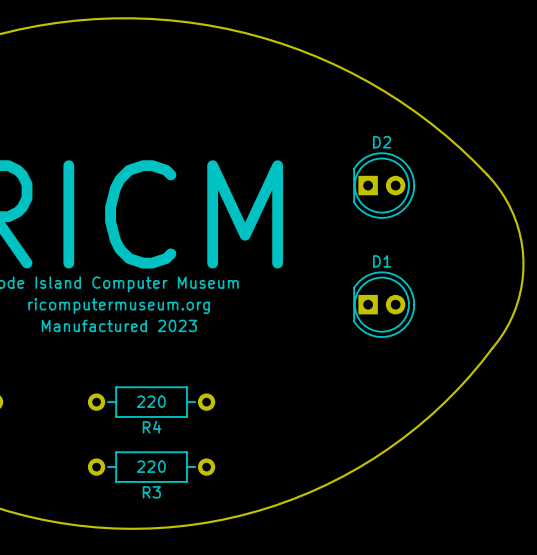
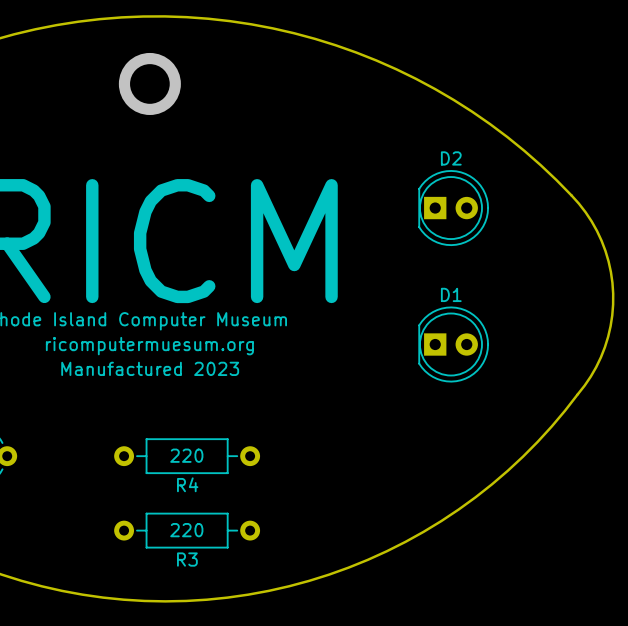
via: none -> (149, 83)
text: ricomputermuseum.org (119, 306) -> ricomputermuesum.org (149, 346)

